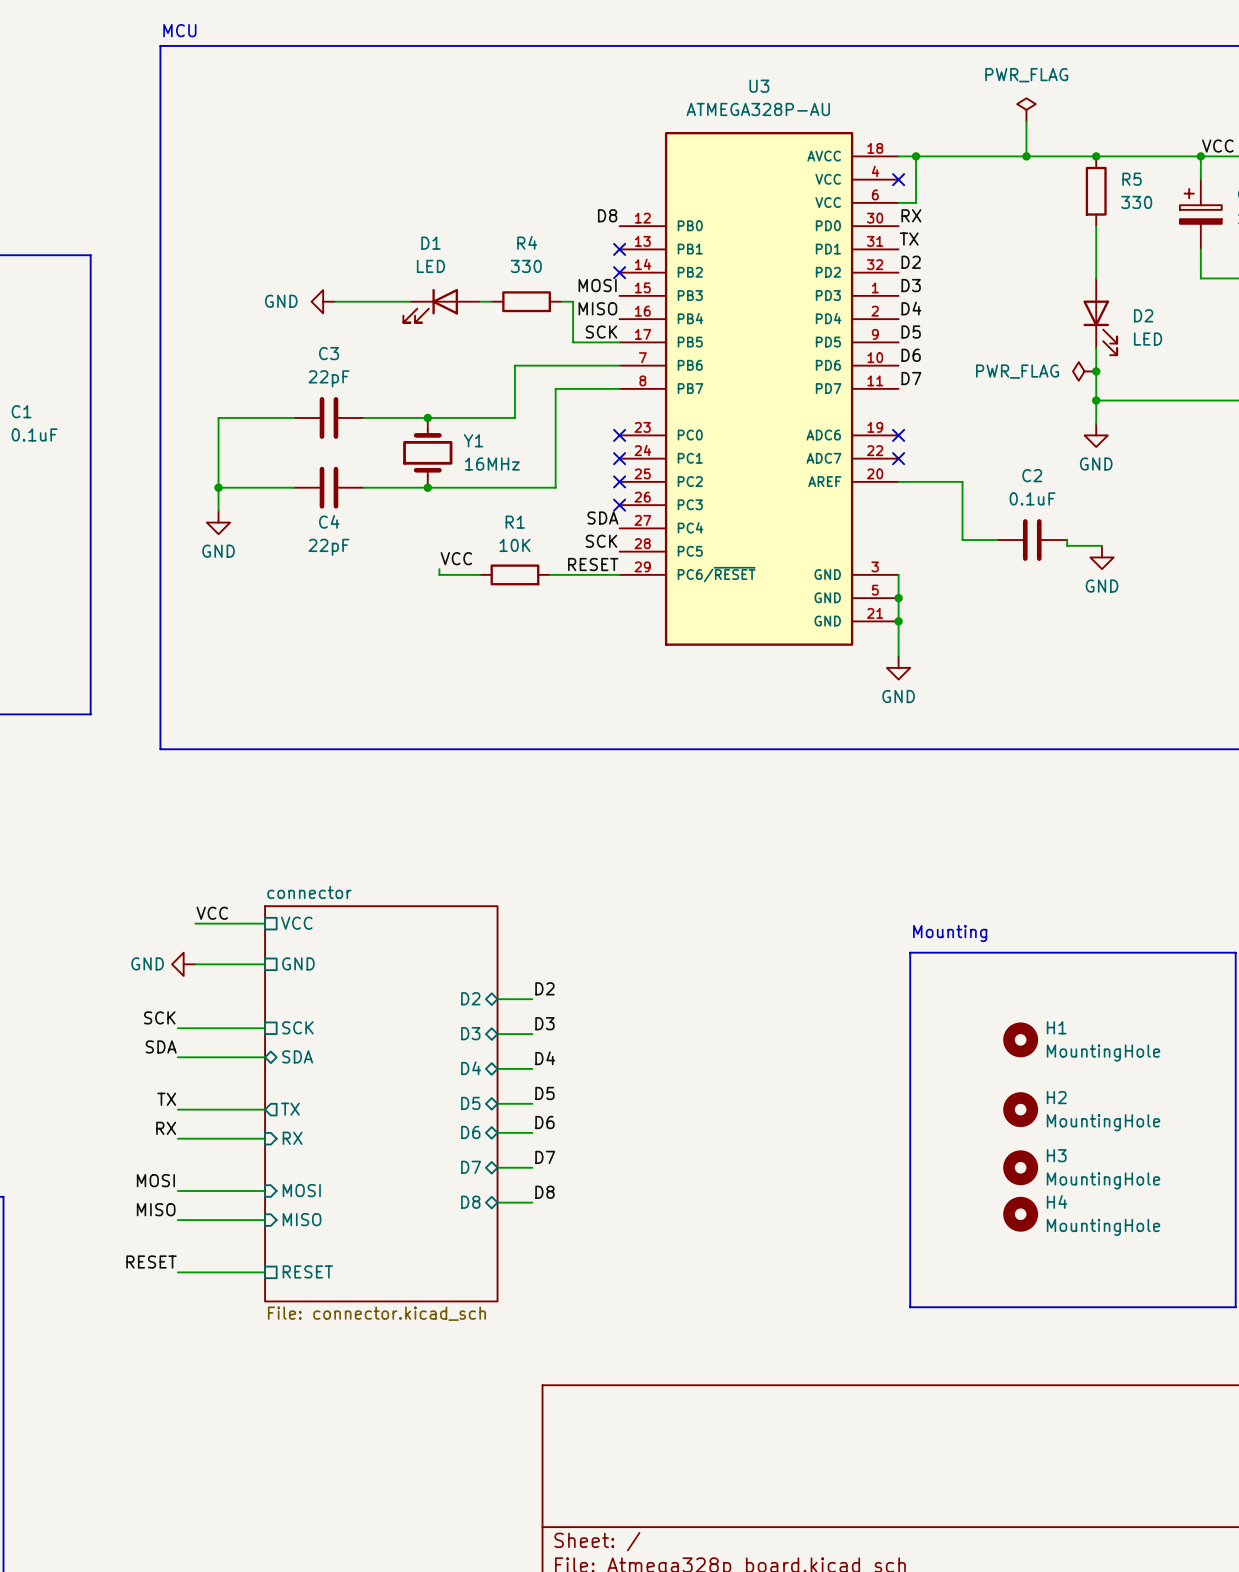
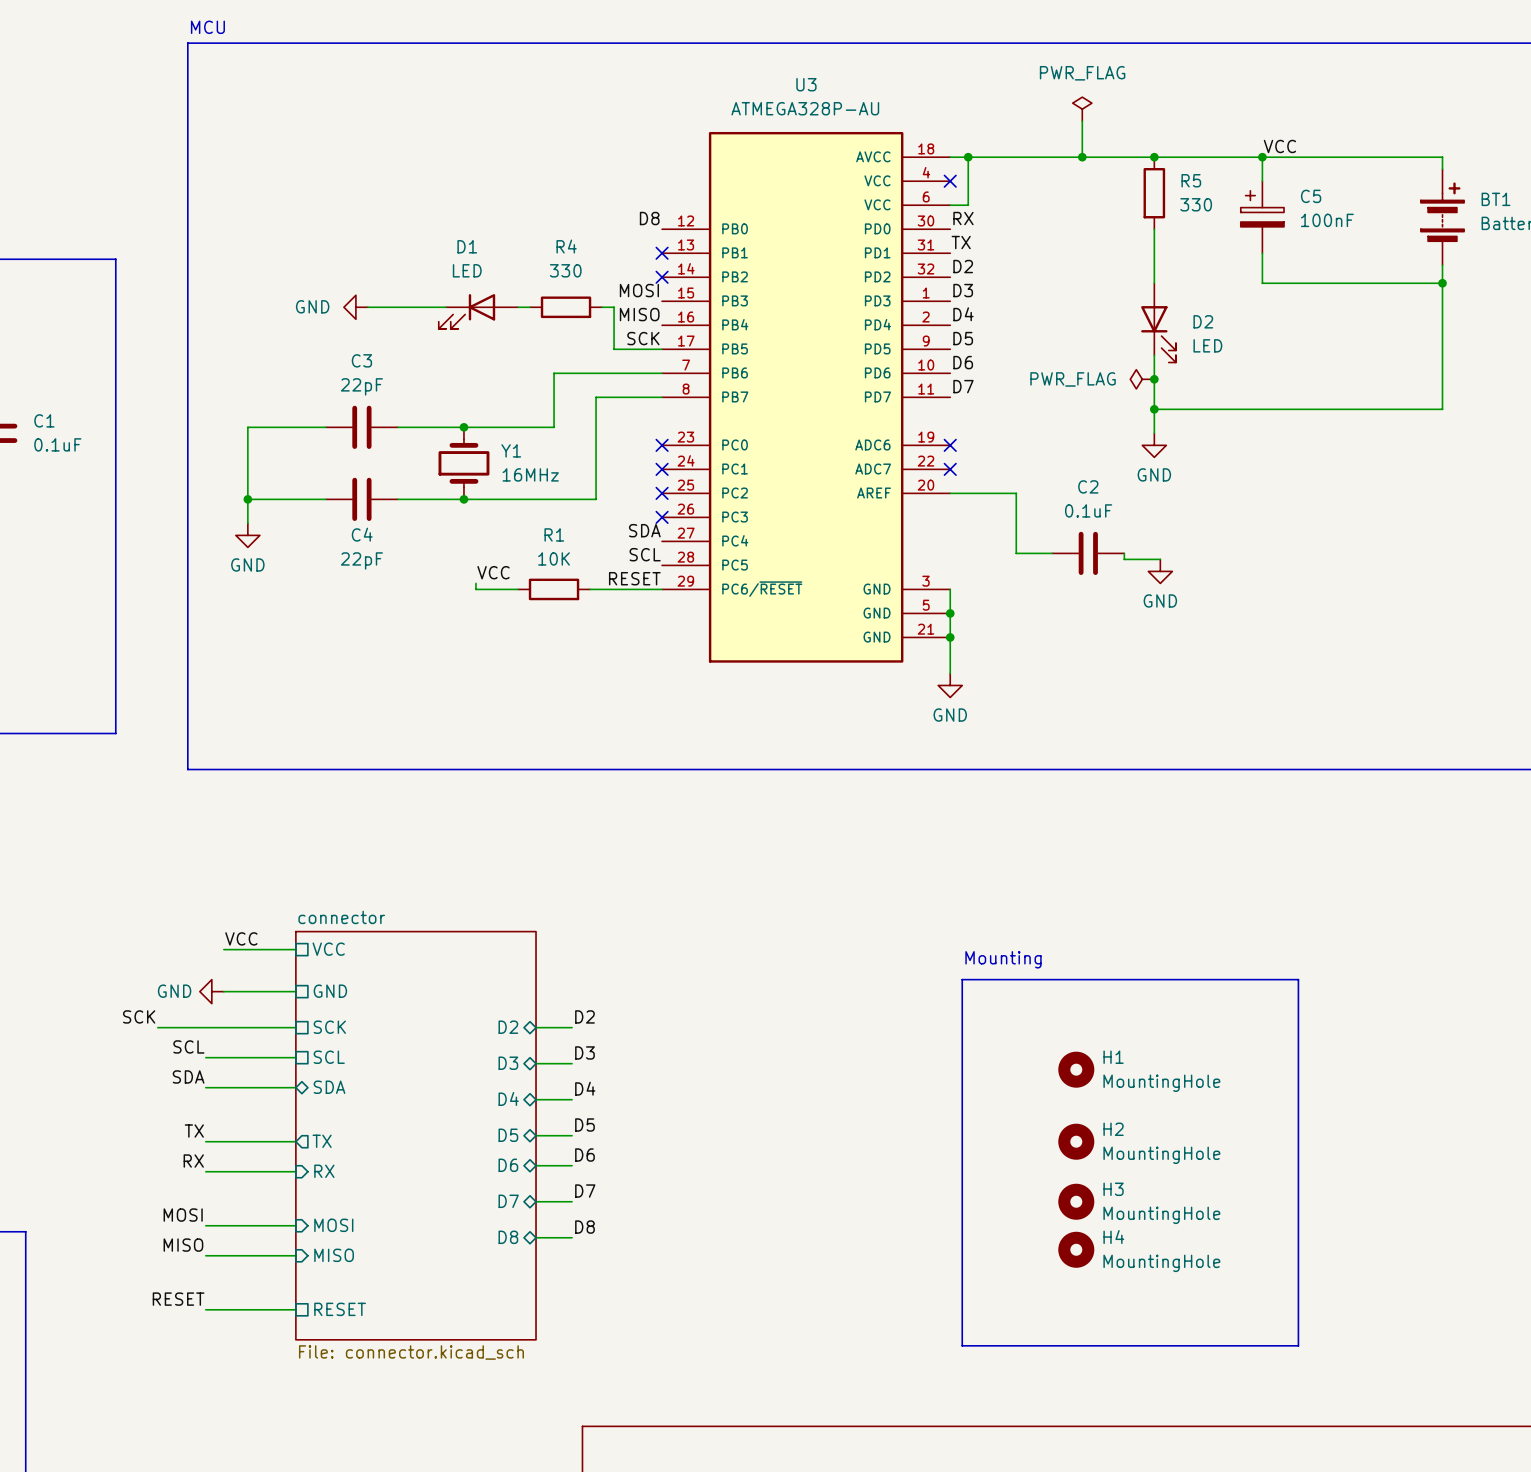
label: SCK (601, 541) -> SCL (645, 554)
label: none -> SCK (139, 1016)
sheet pin: none -> SCK (329, 1027)
wire: none -> (157, 1027) (295, 1027)
label: SCK (159, 1017) -> SCL (188, 1046)
sheet pin: SCK (297, 1027) -> SCL (329, 1057)

